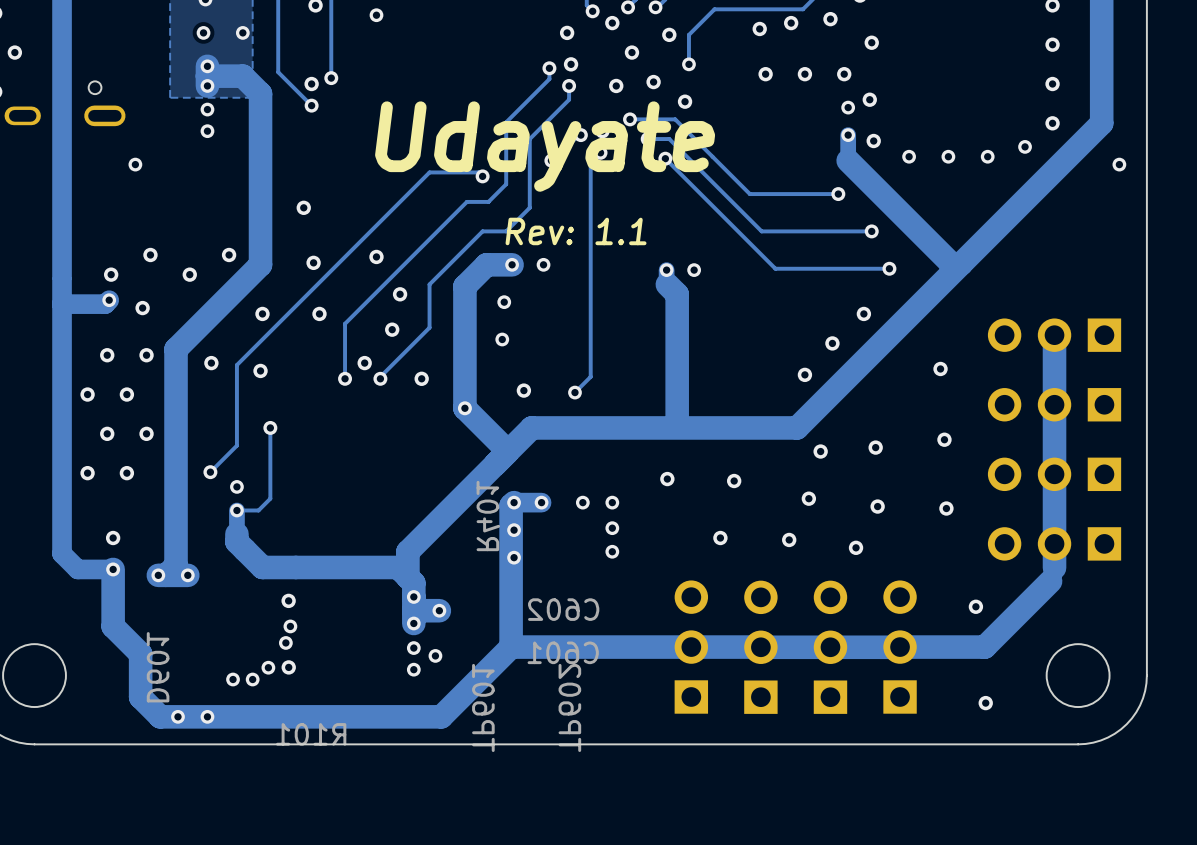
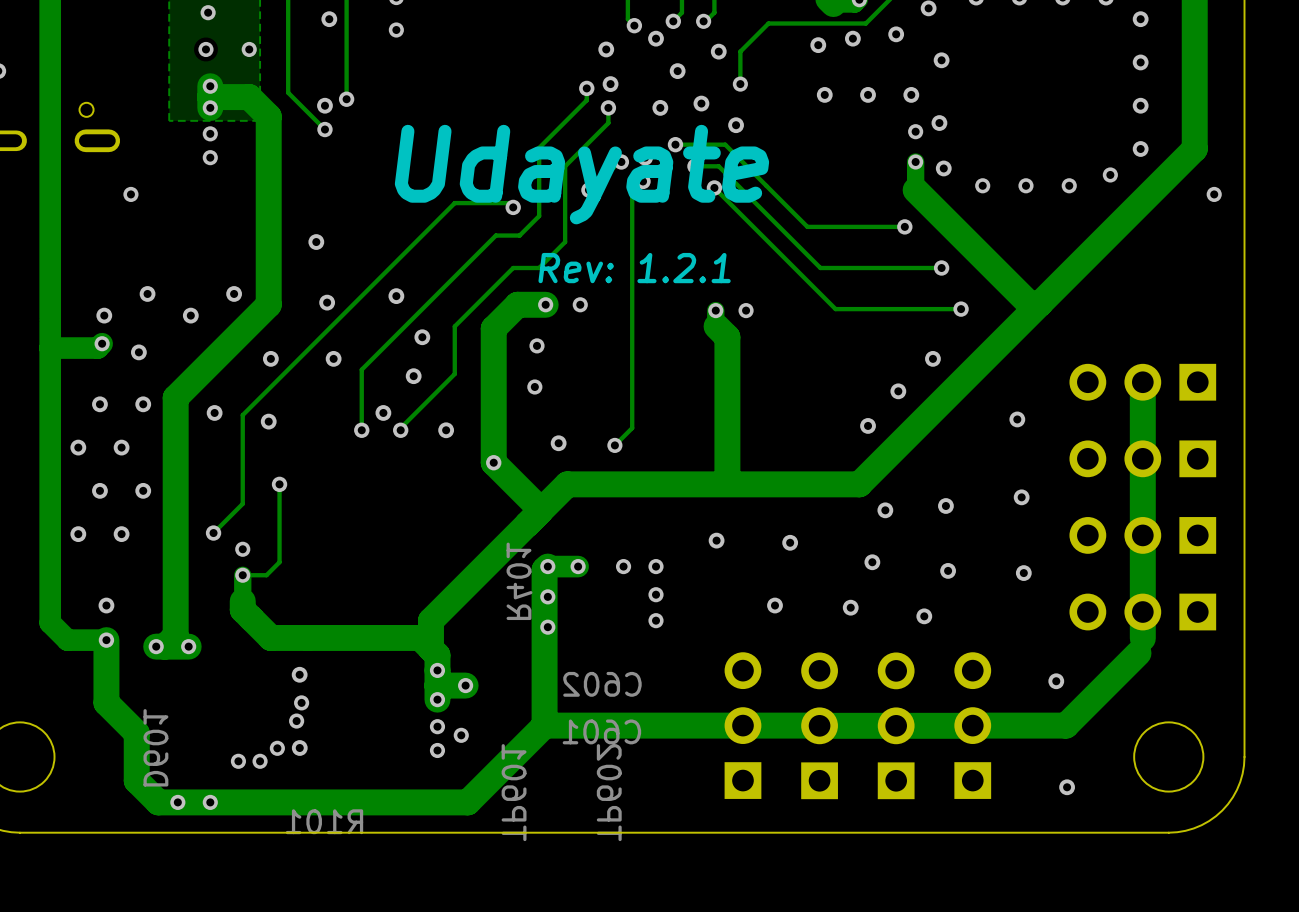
text: Rev: 1.1 (576, 231) -> Rev: 1.2.1 (634, 268)

